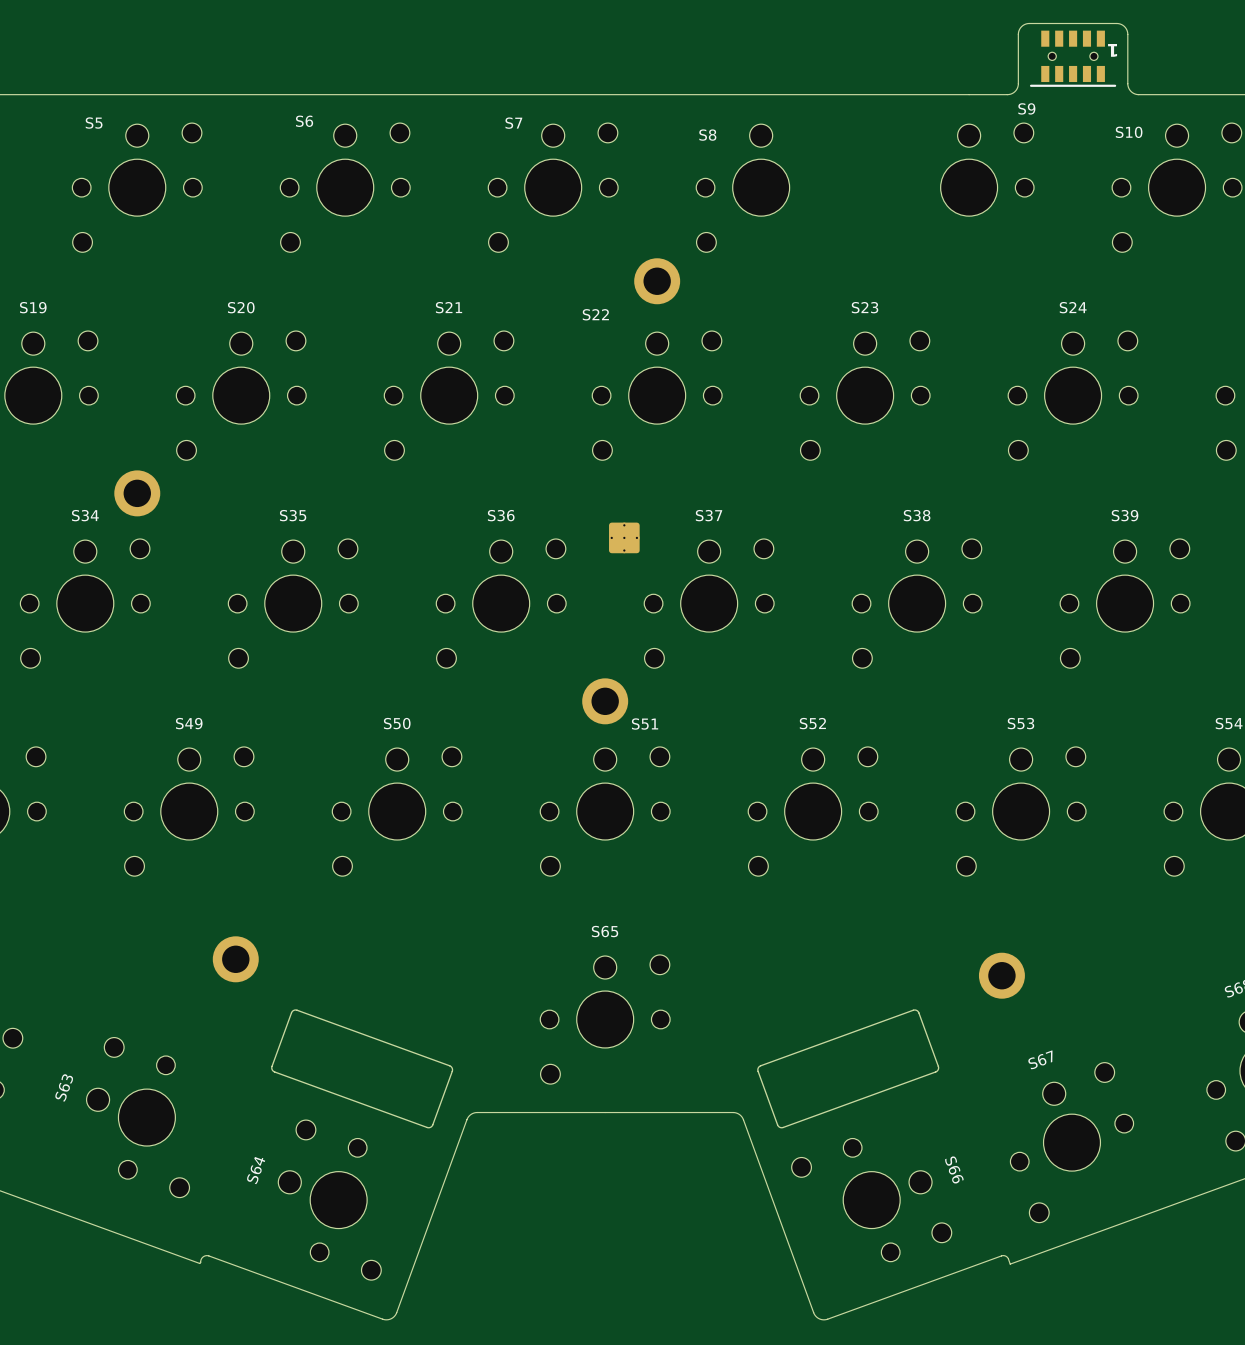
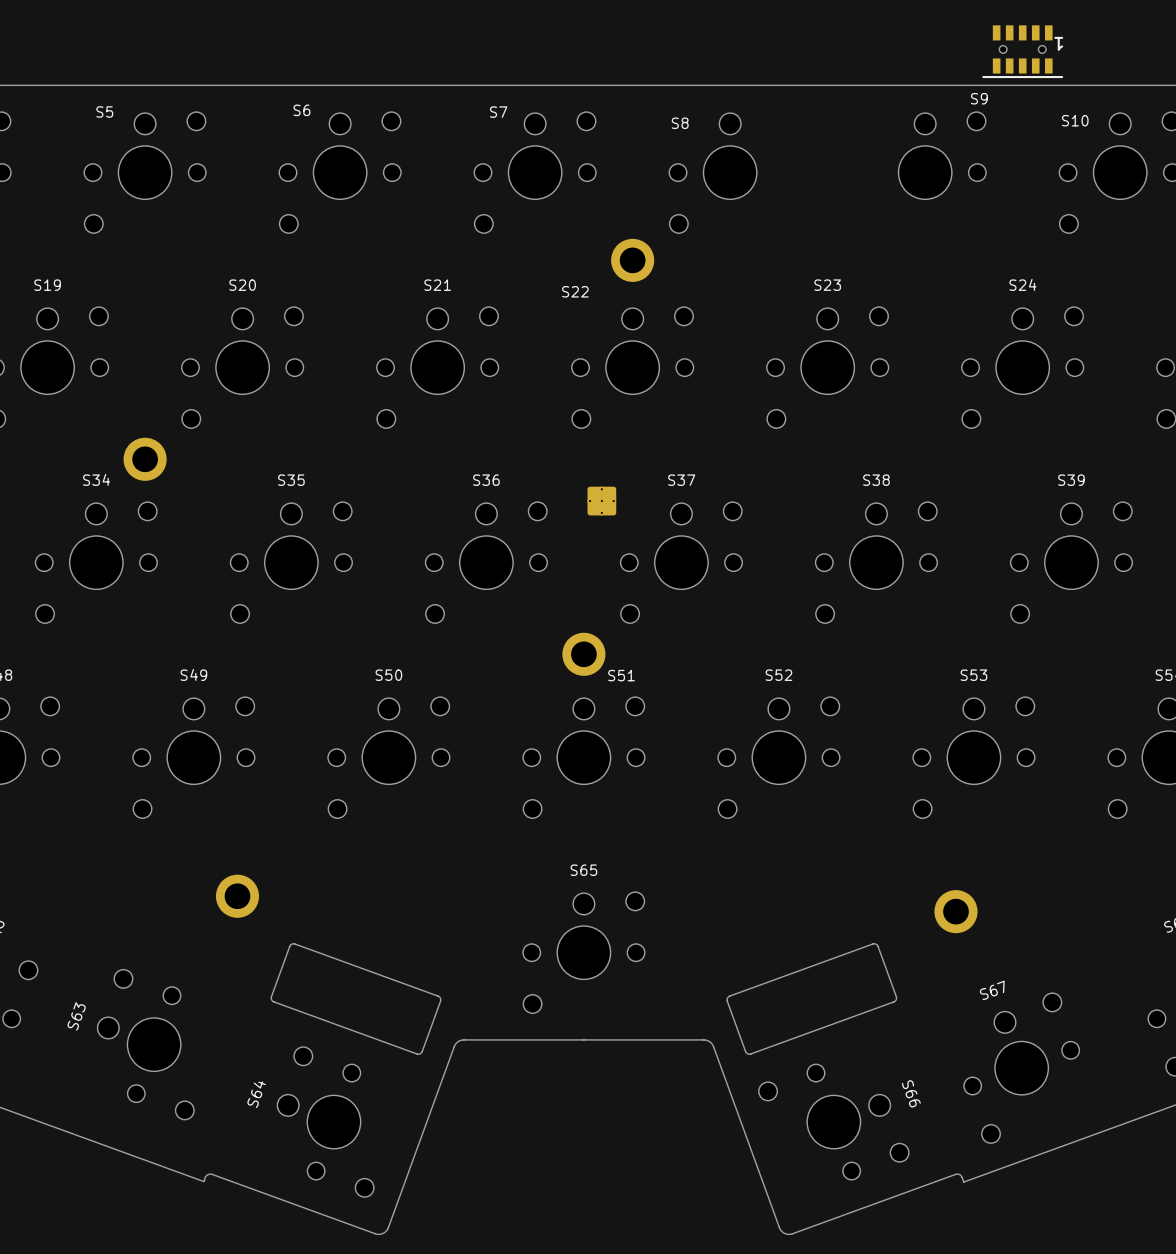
board edge: (1007, 94) (1014, 92) (1018, 86) (1018, 30) (1022, 25) (1029, 23) (1116, 23) (1122, 25) (1127, 33) (1128, 86) (1131, 92) (1138, 94) -> (961, 85) (1084, 85)

